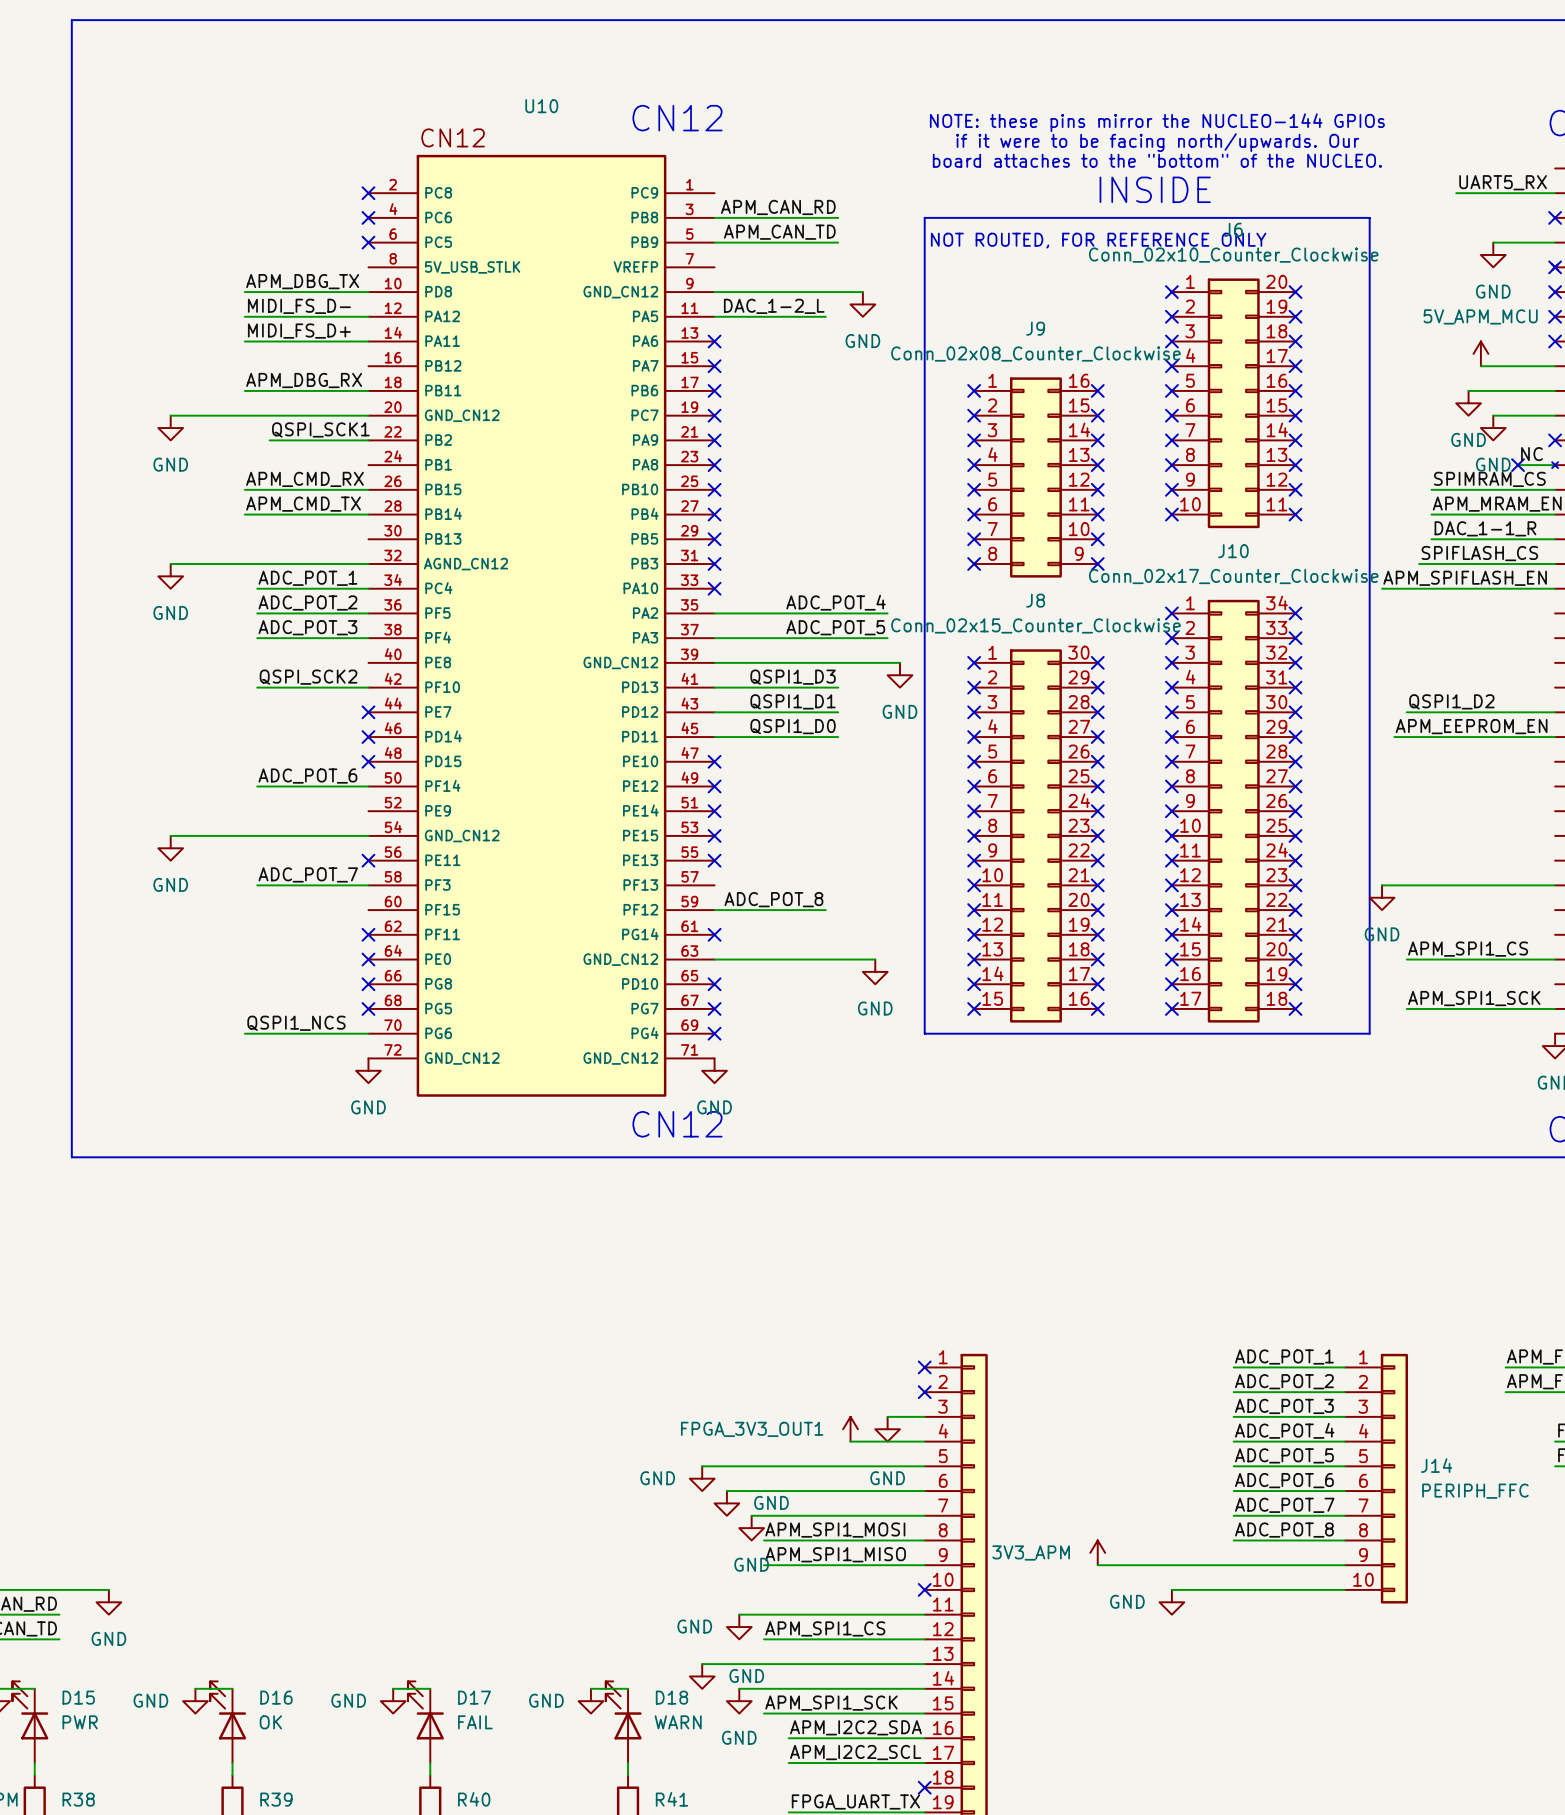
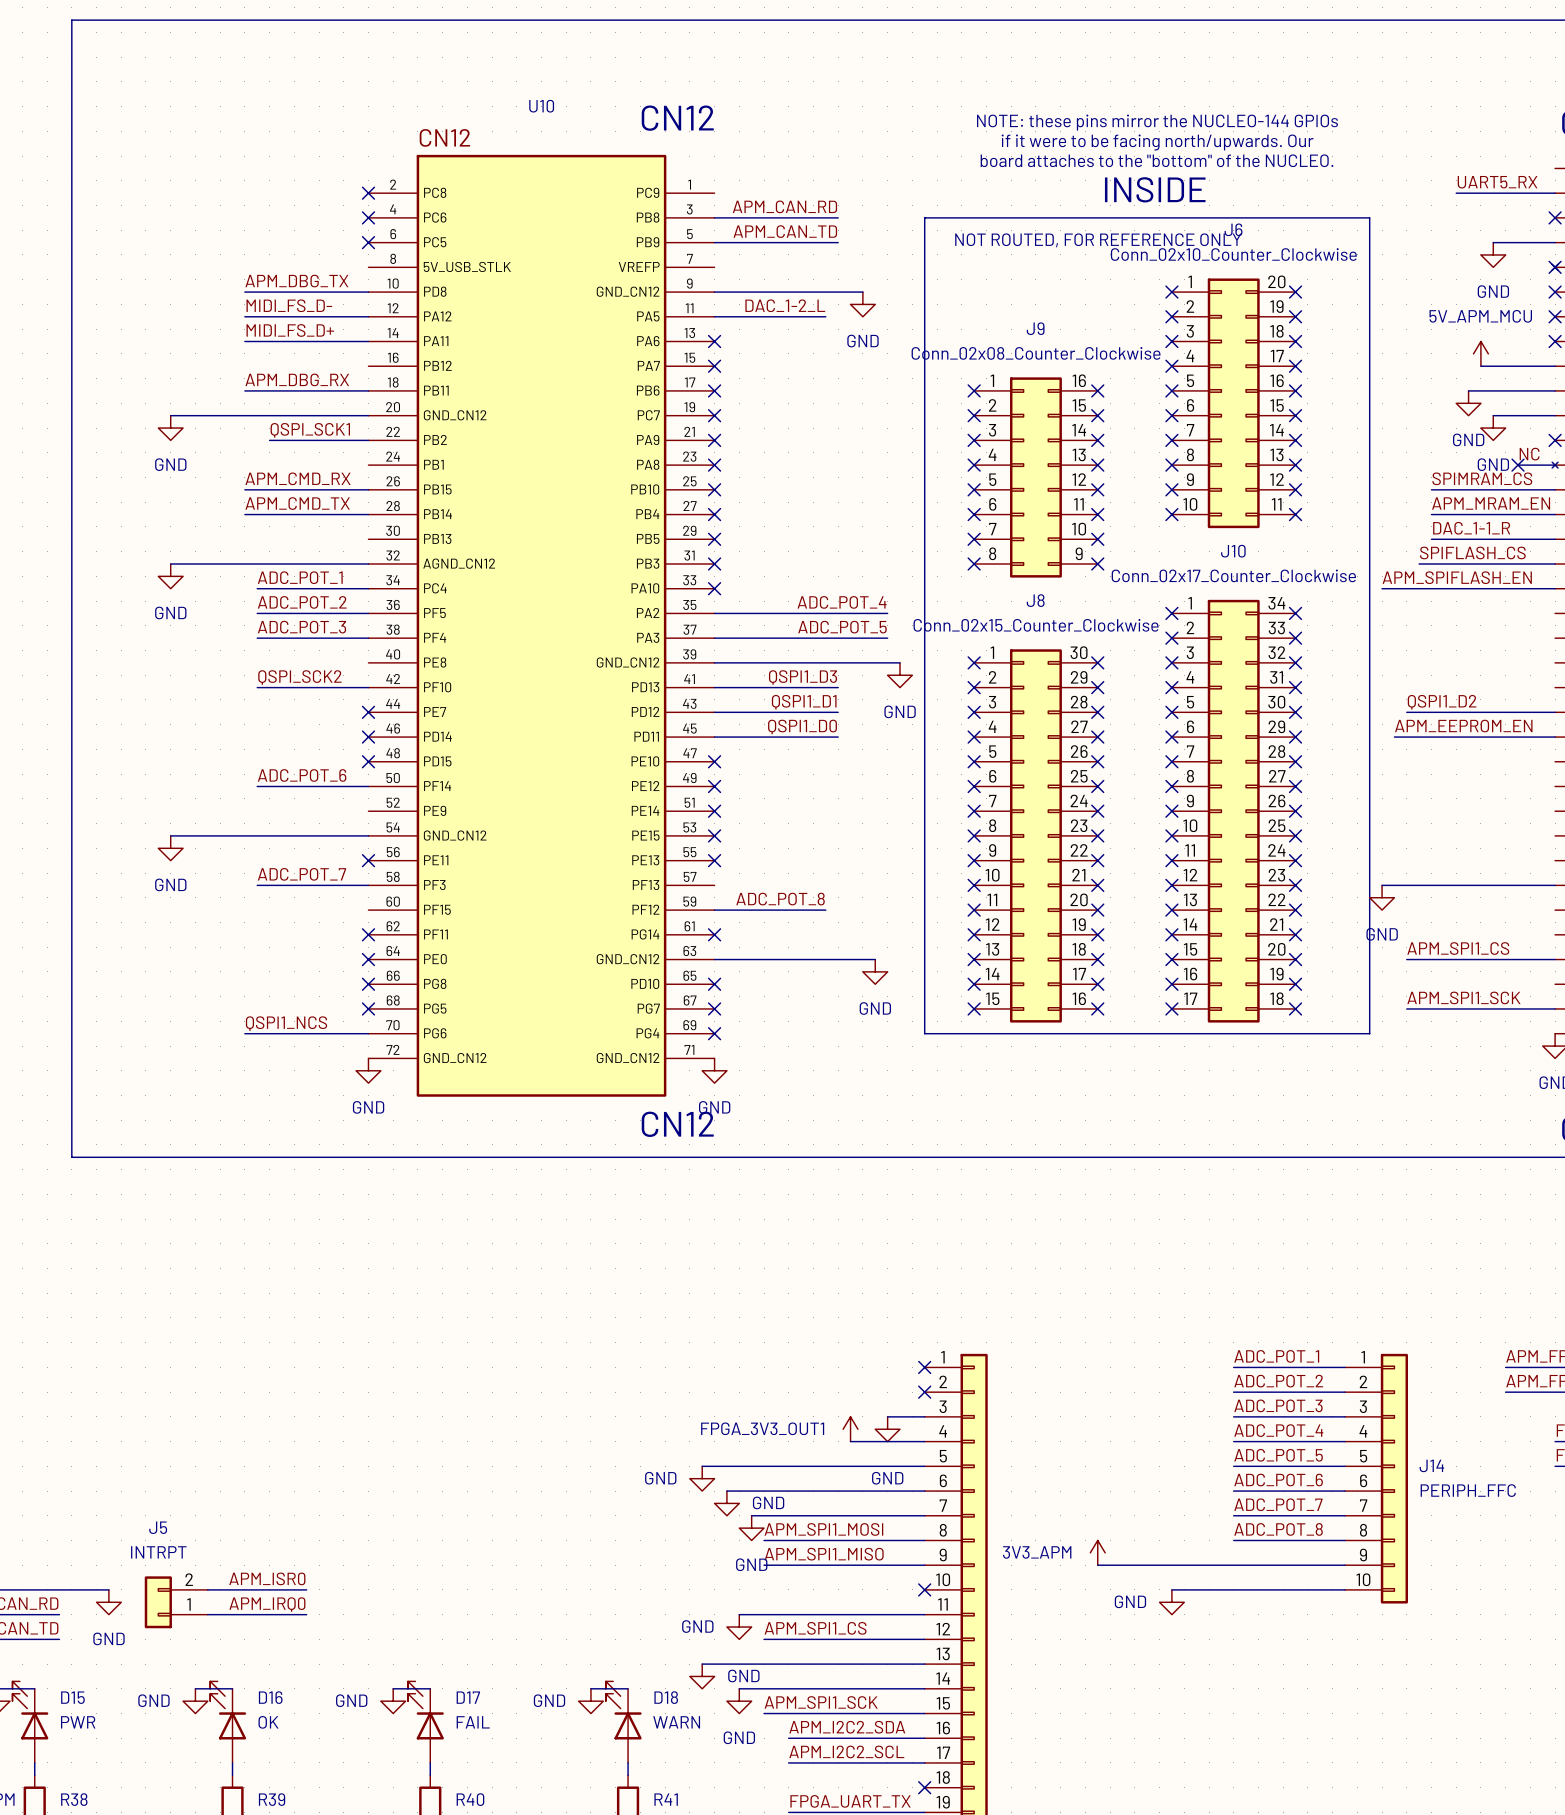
label: none -> APM_ISR0 (267, 1578)
wire: none -> (207, 1589) (306, 1589)
J5: none -> INTRPT (176, 1602)
label: none -> APM_IRQ0 (267, 1604)
wire: none -> (207, 1614) (306, 1614)

